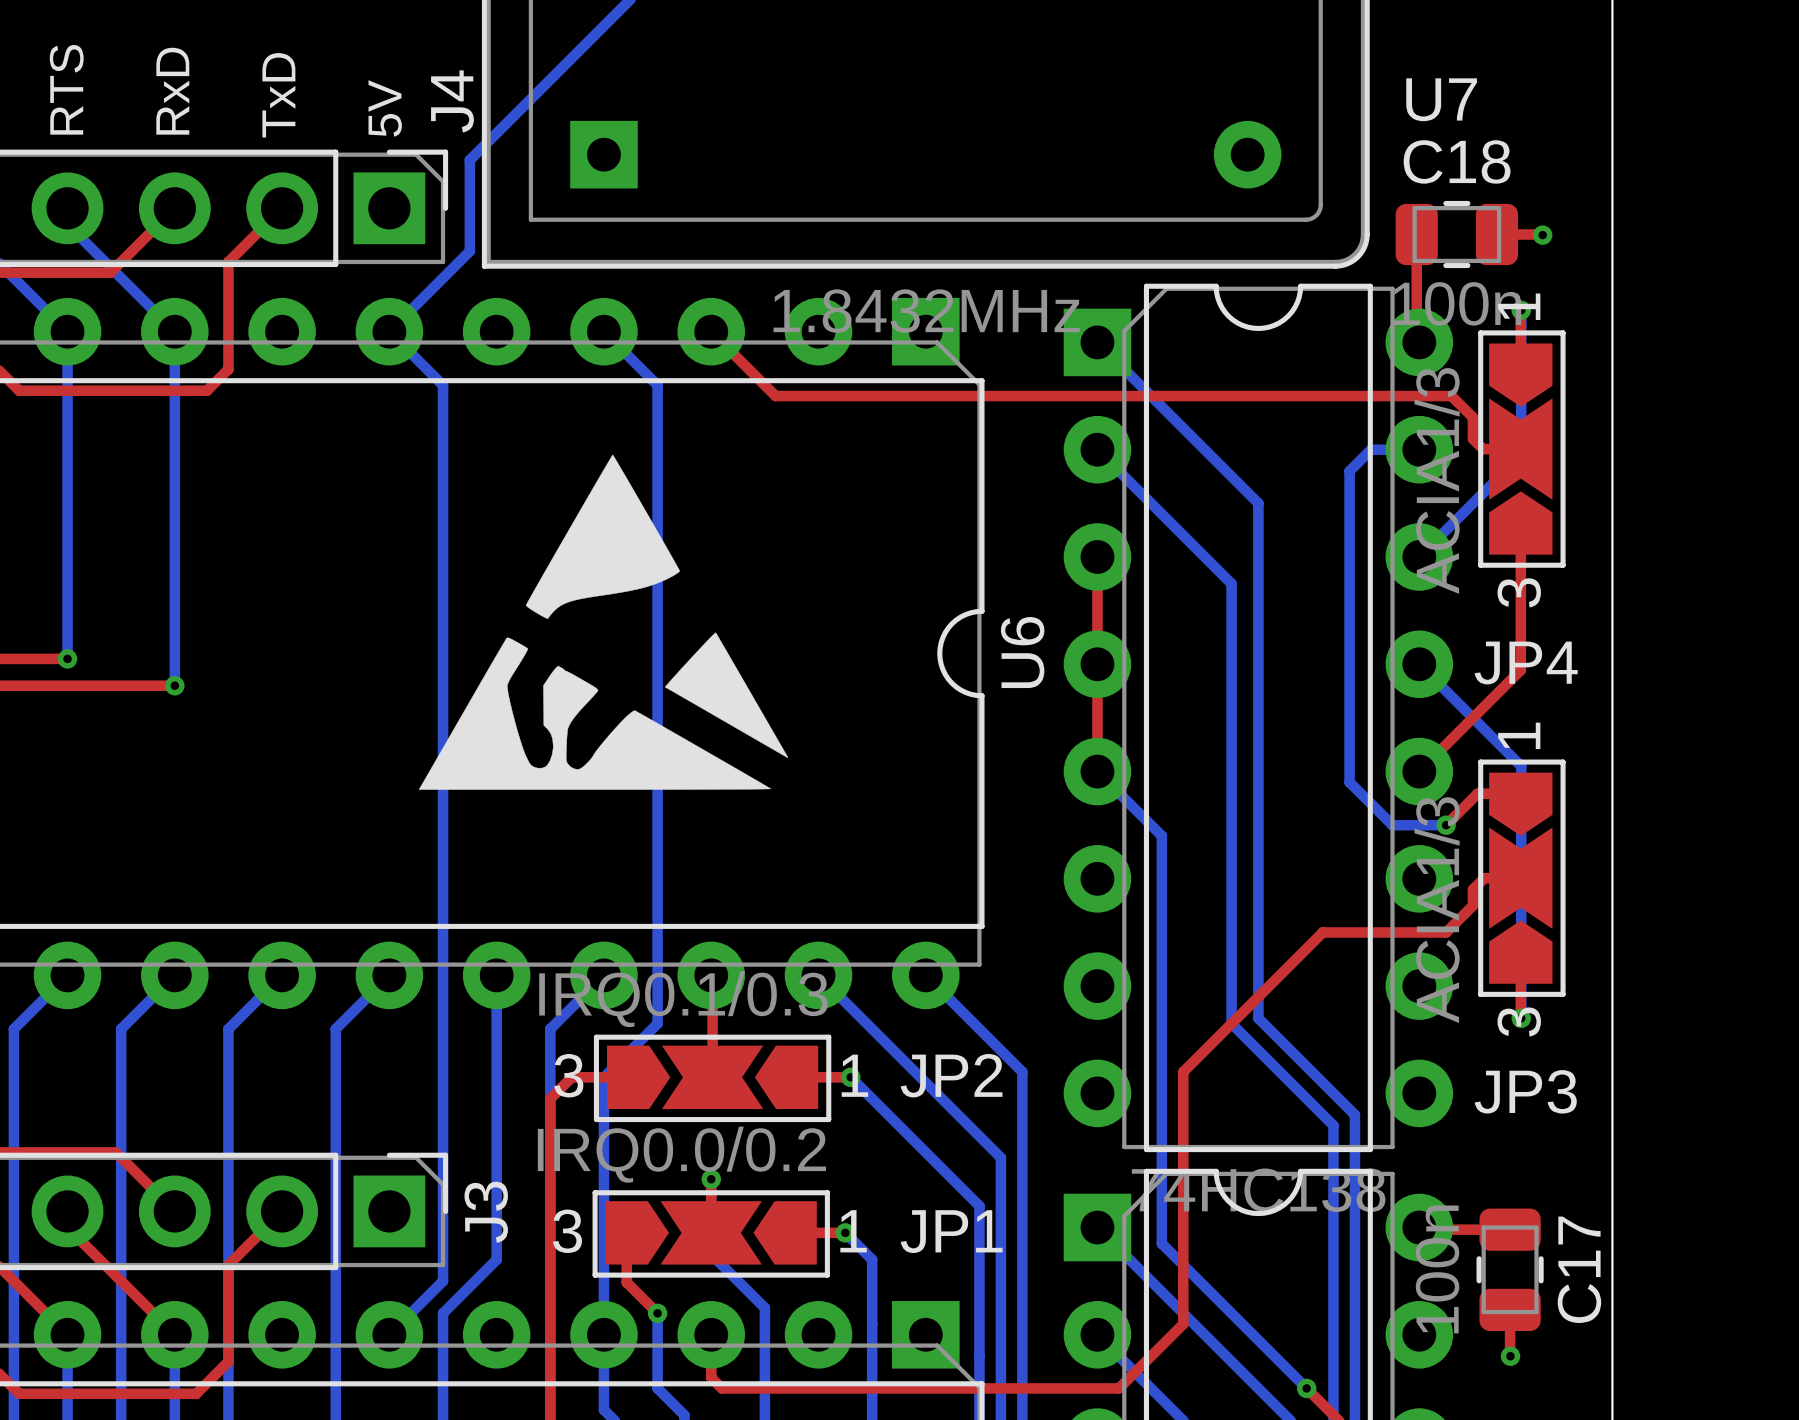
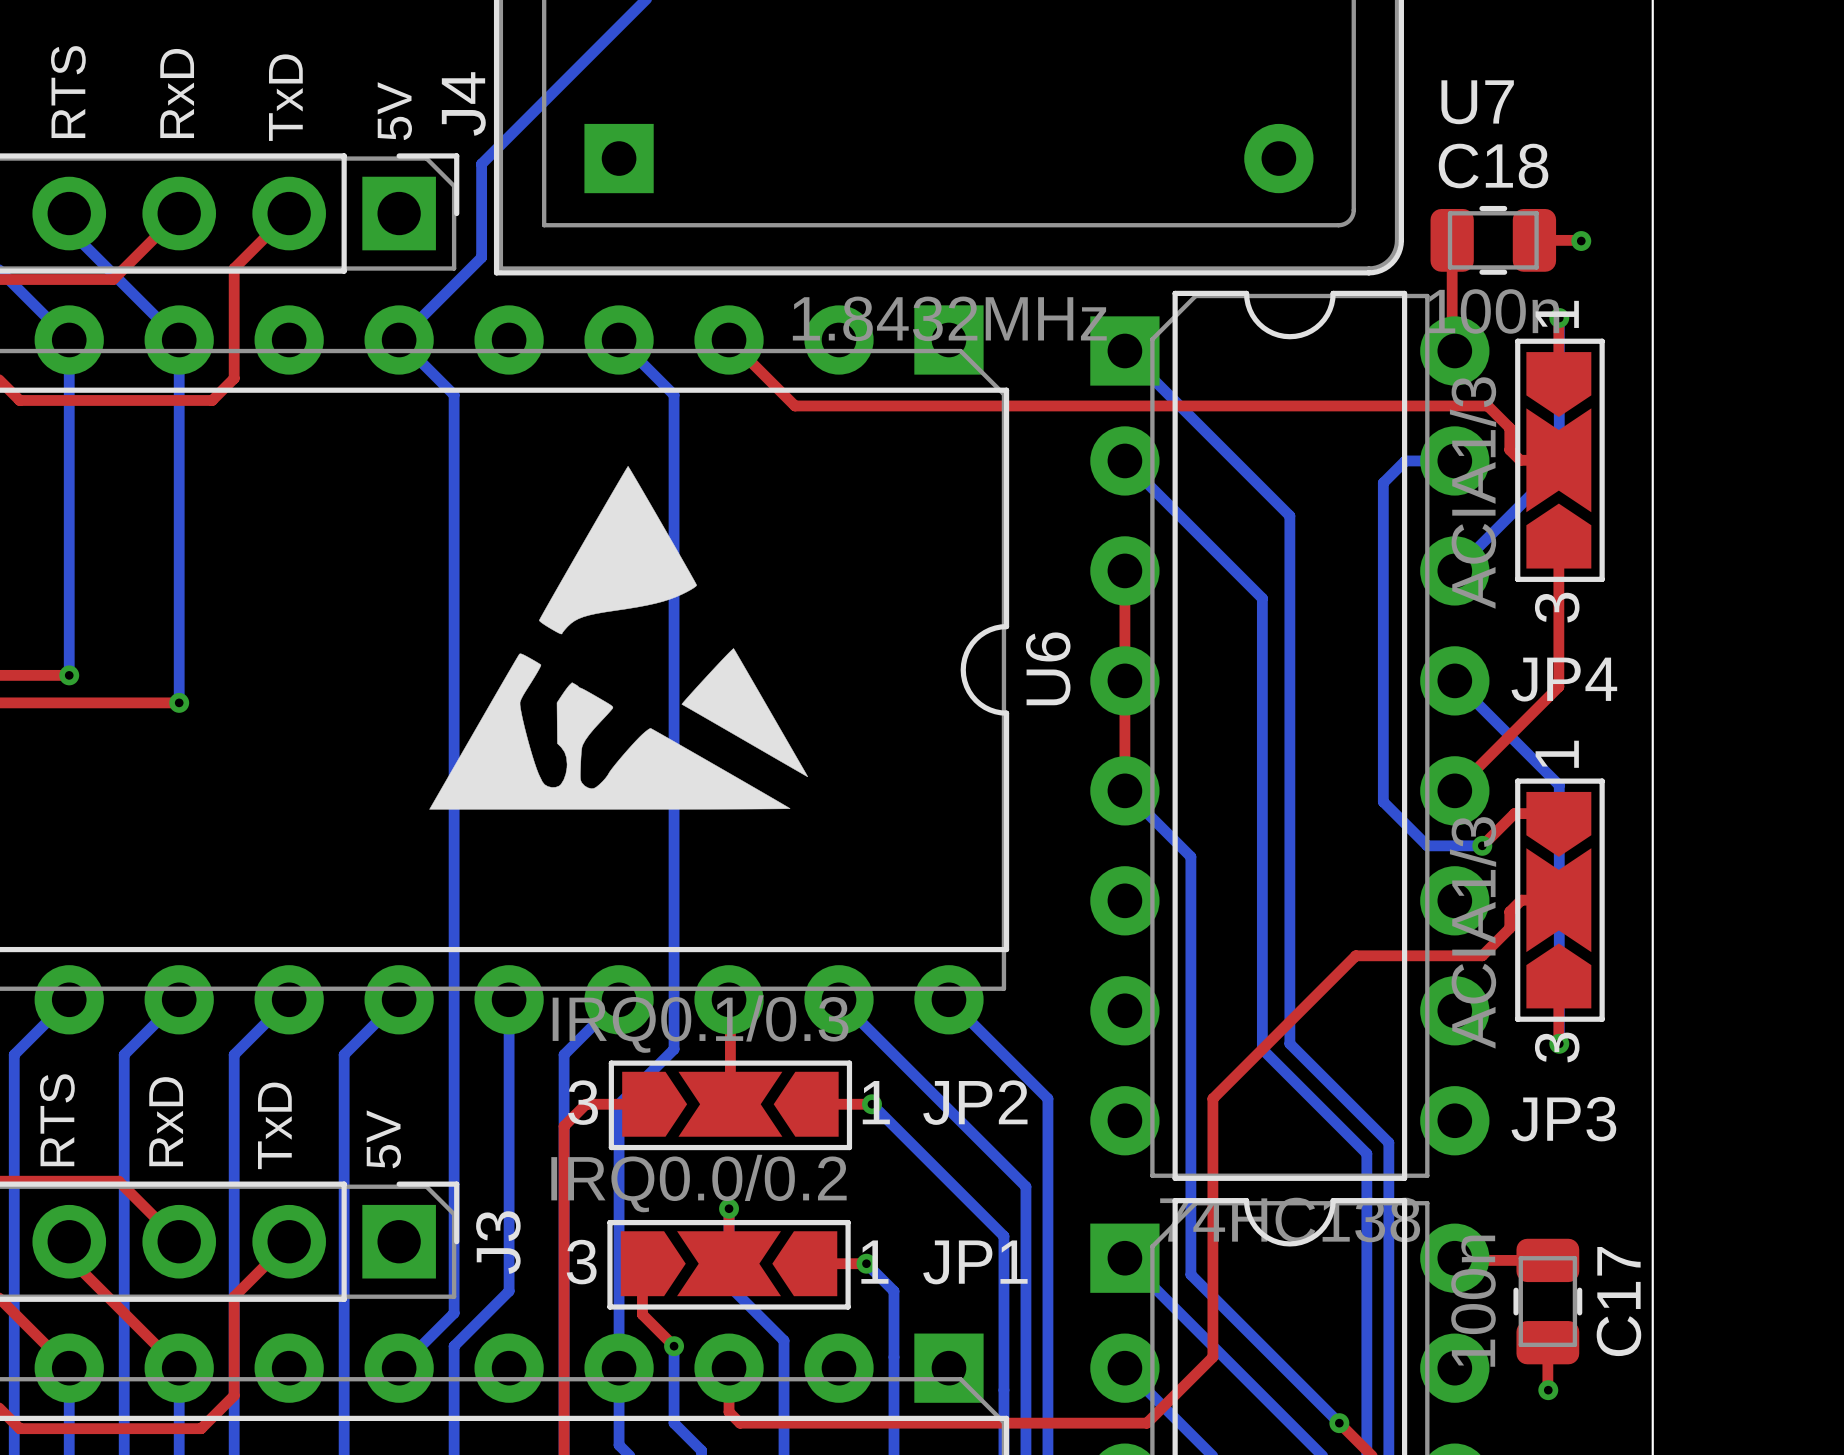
text: none -> RTS (57, 1120)
text: none -> RxD (166, 1121)
text: none -> TxD (274, 1125)
text: none -> 5V (383, 1139)

